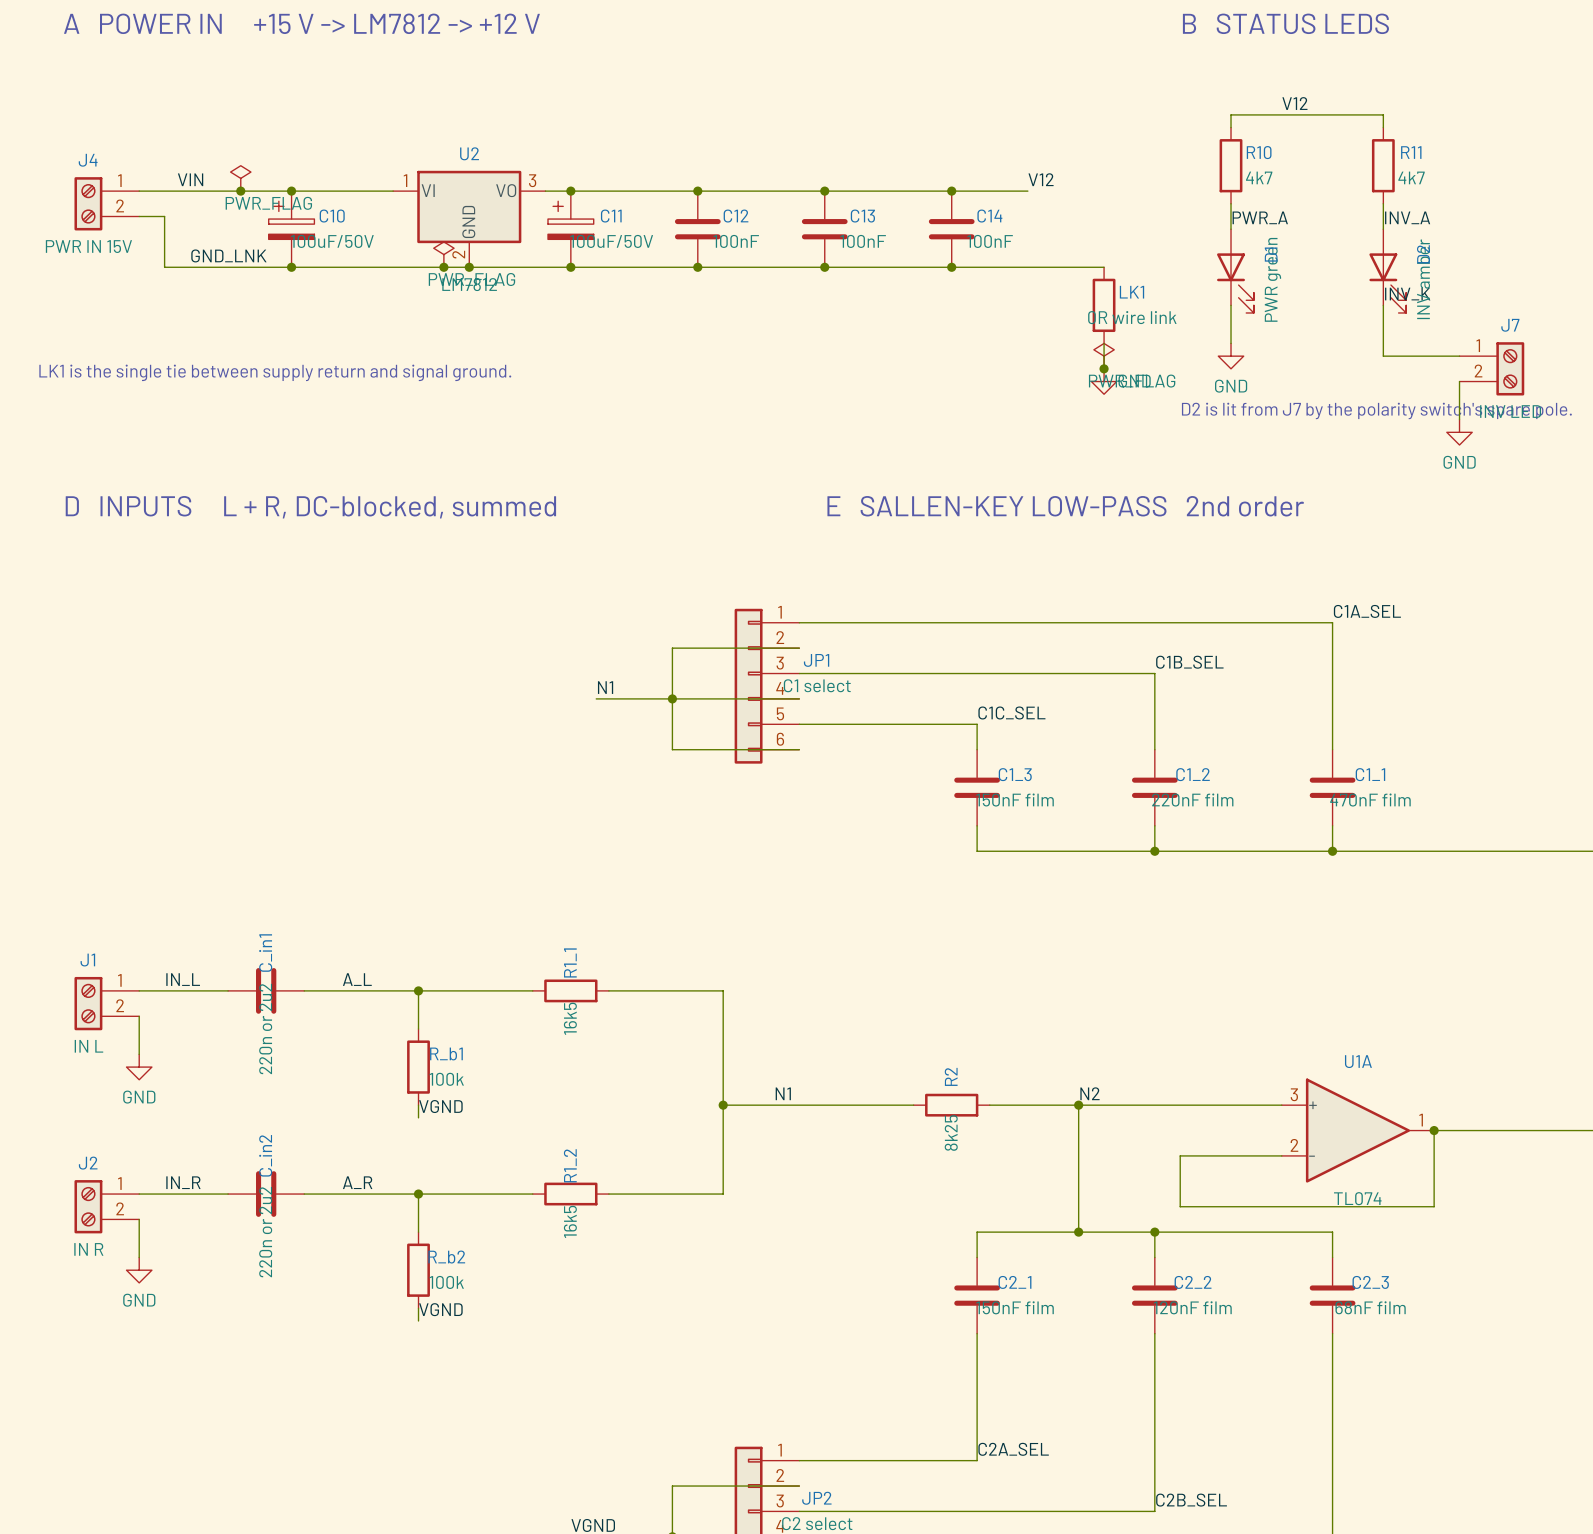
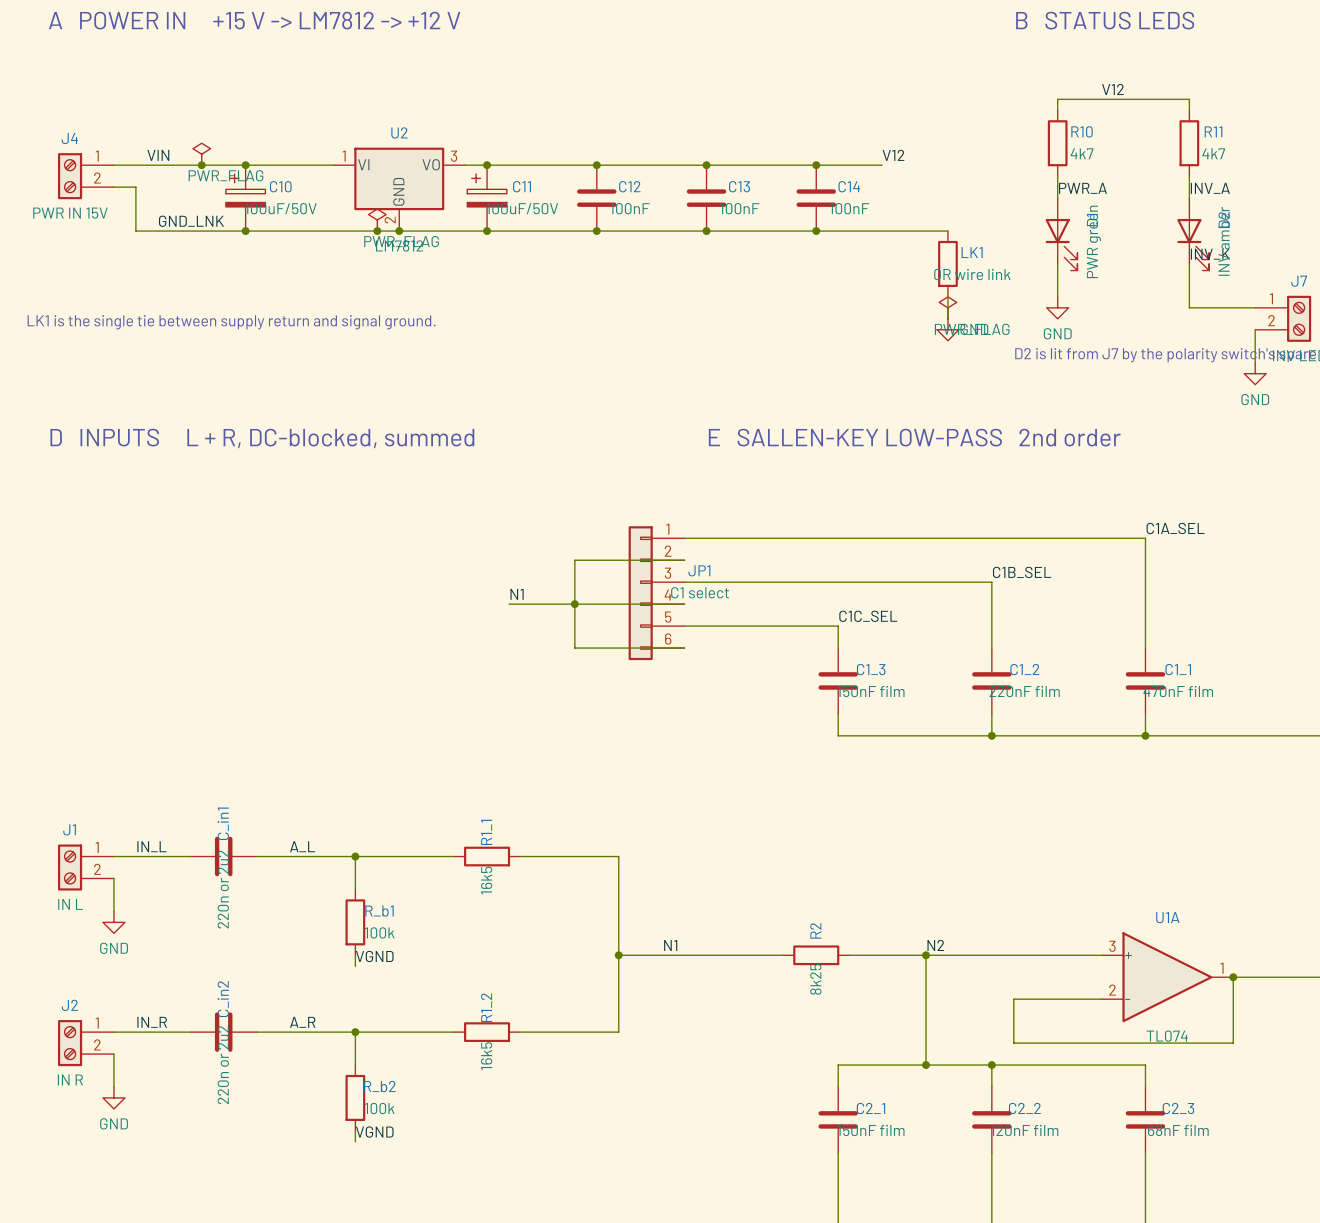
junction: (1104, 368) -> none

